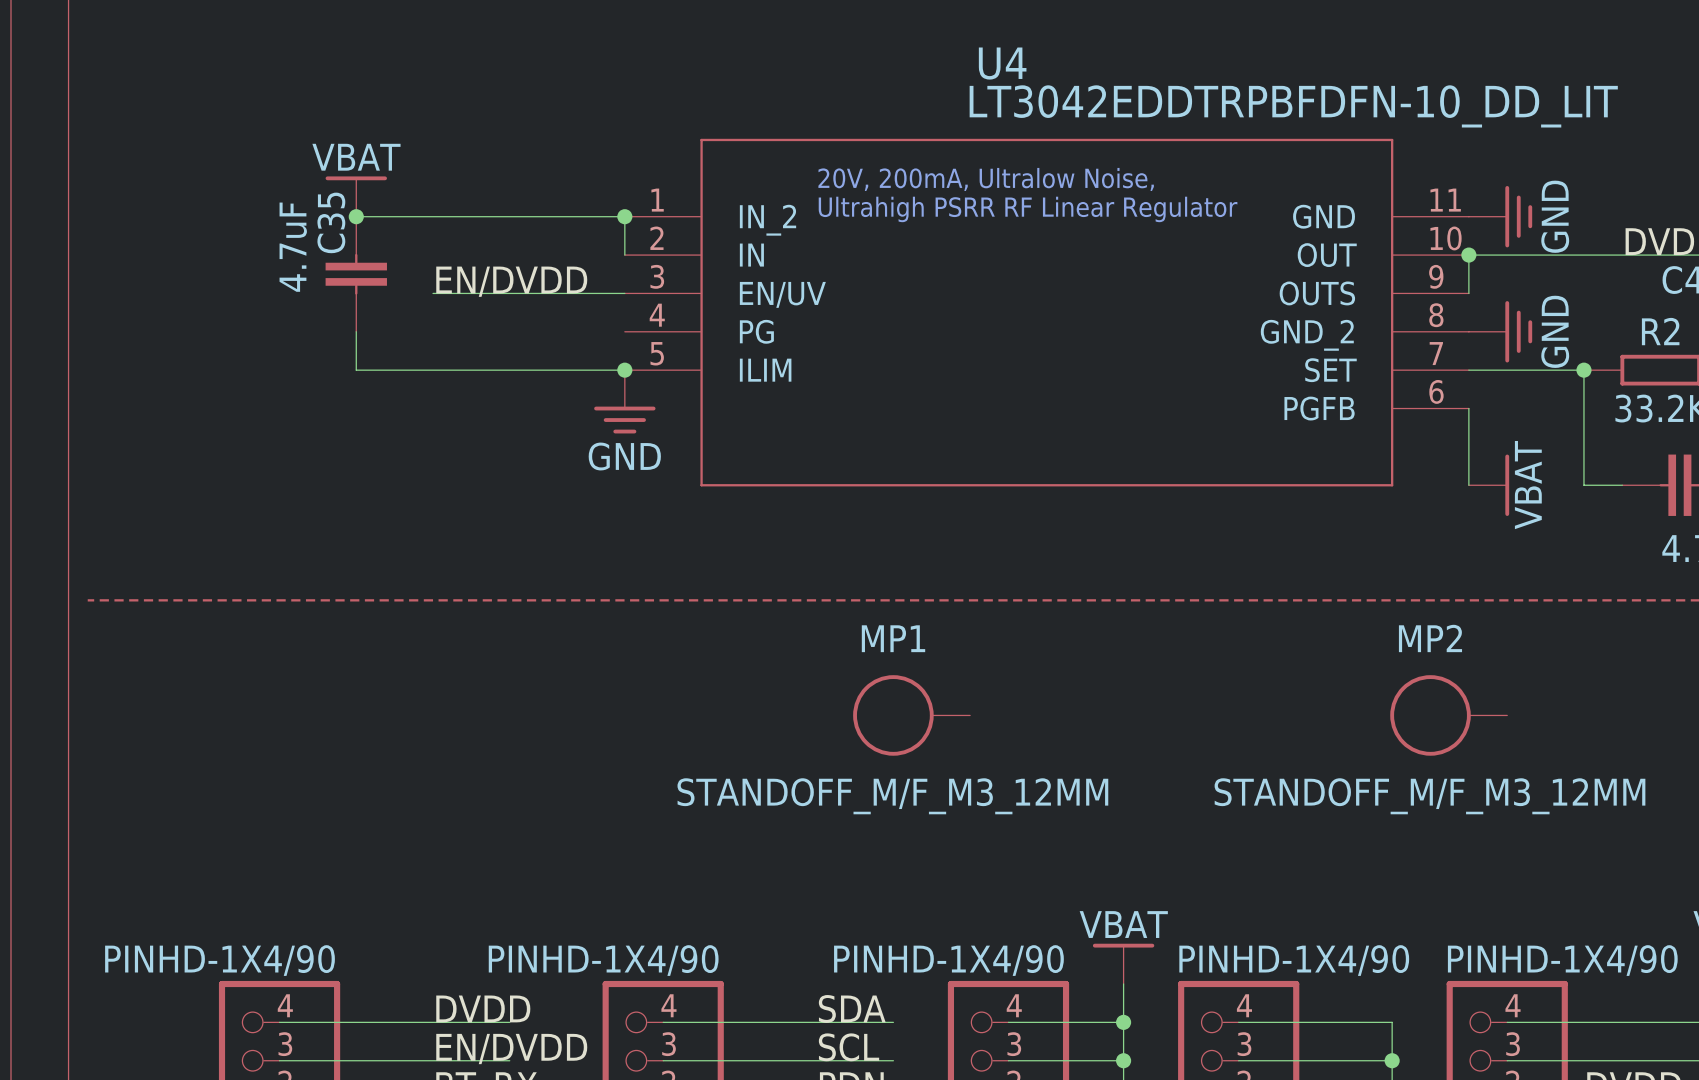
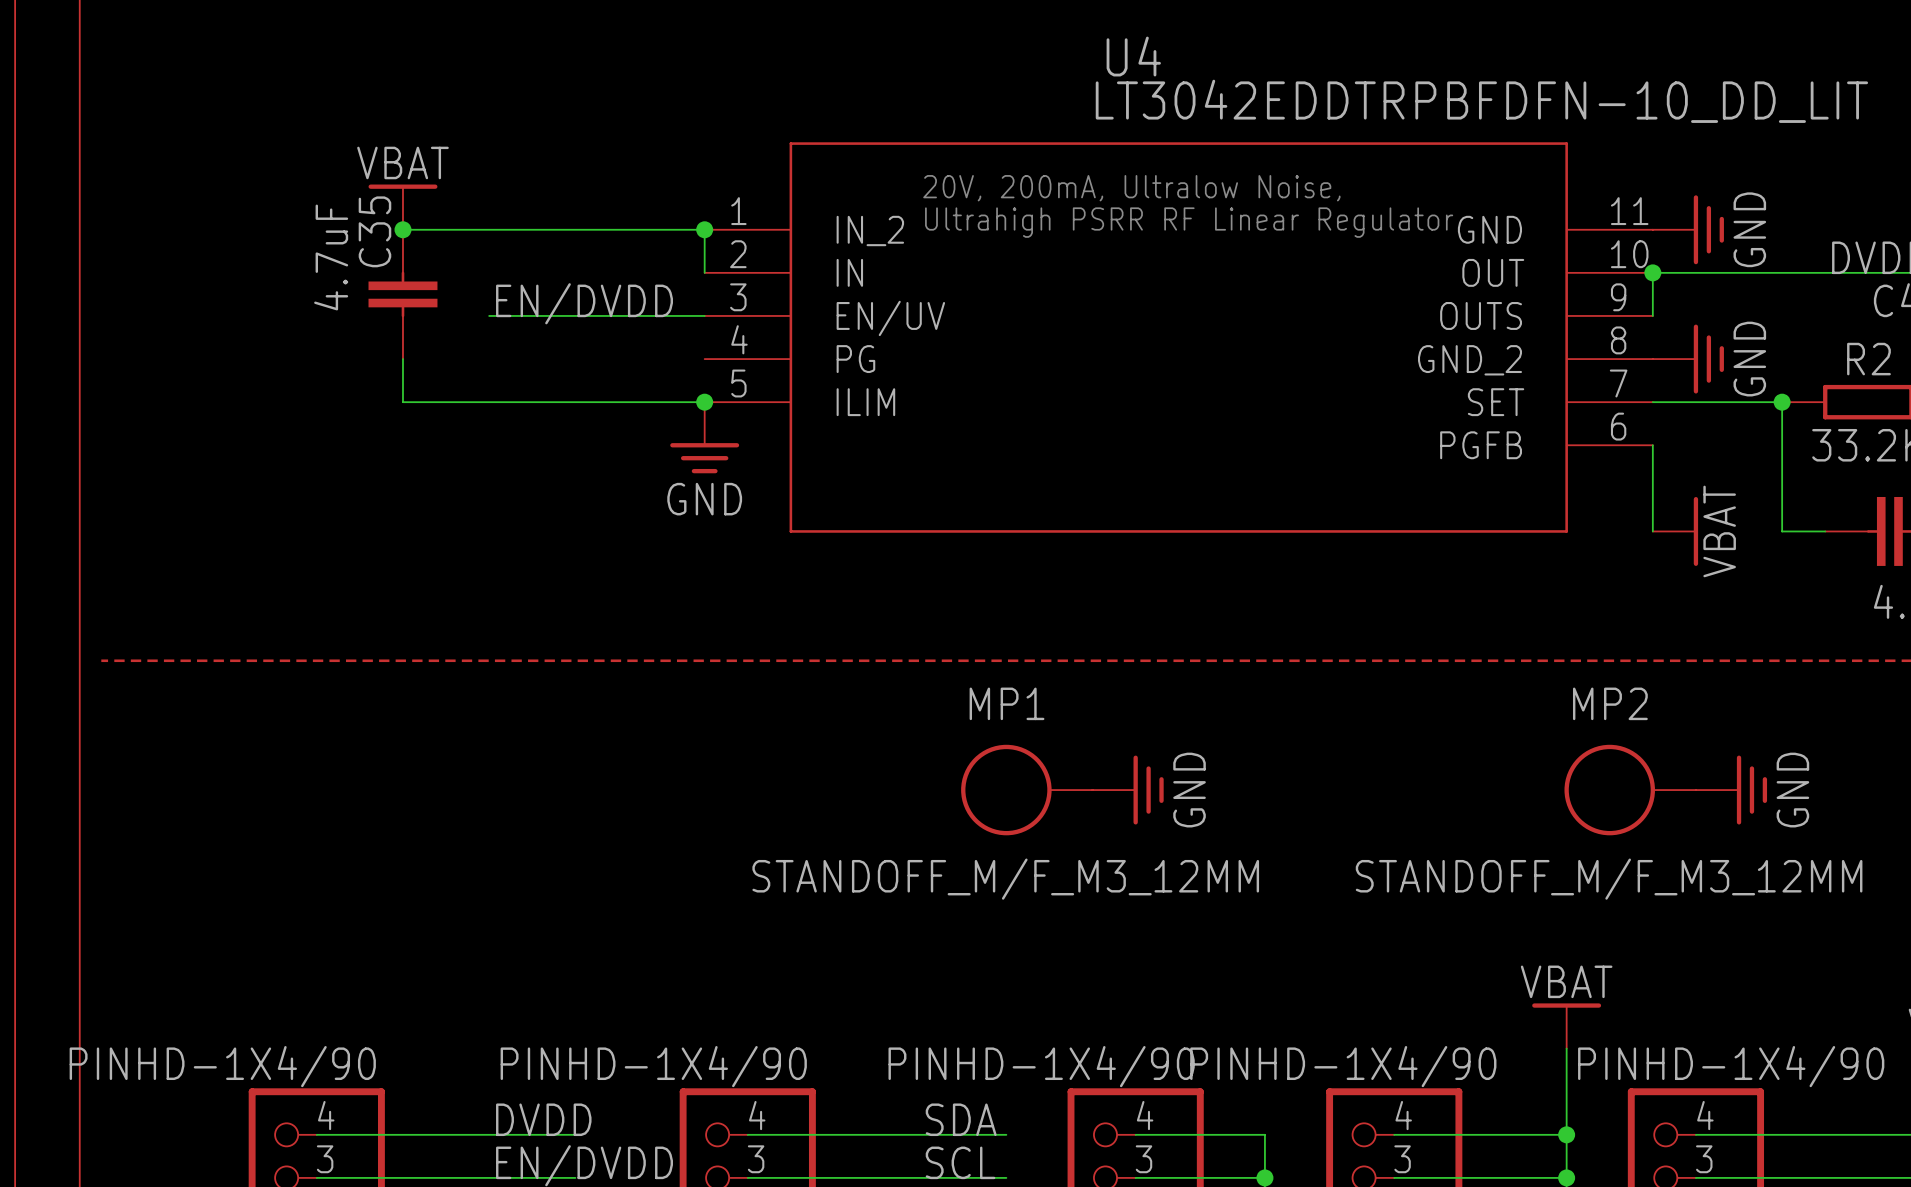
power symbol: none -> GND (1128, 790)
power symbol: none -> GND (1731, 790)
wire: none -> (1566, 1048) (1566, 1134)
part value position: PINHD-1X4/90 (1294, 960) -> PINHD-1X4/90 (1343, 1066)
power symbol position: VBAT (1123, 963) -> VBAT (1566, 1026)
wire: (1123, 984) (1123, 1022) -> none
junction: (1123, 1022) -> none
junction: none -> (1566, 1134)

